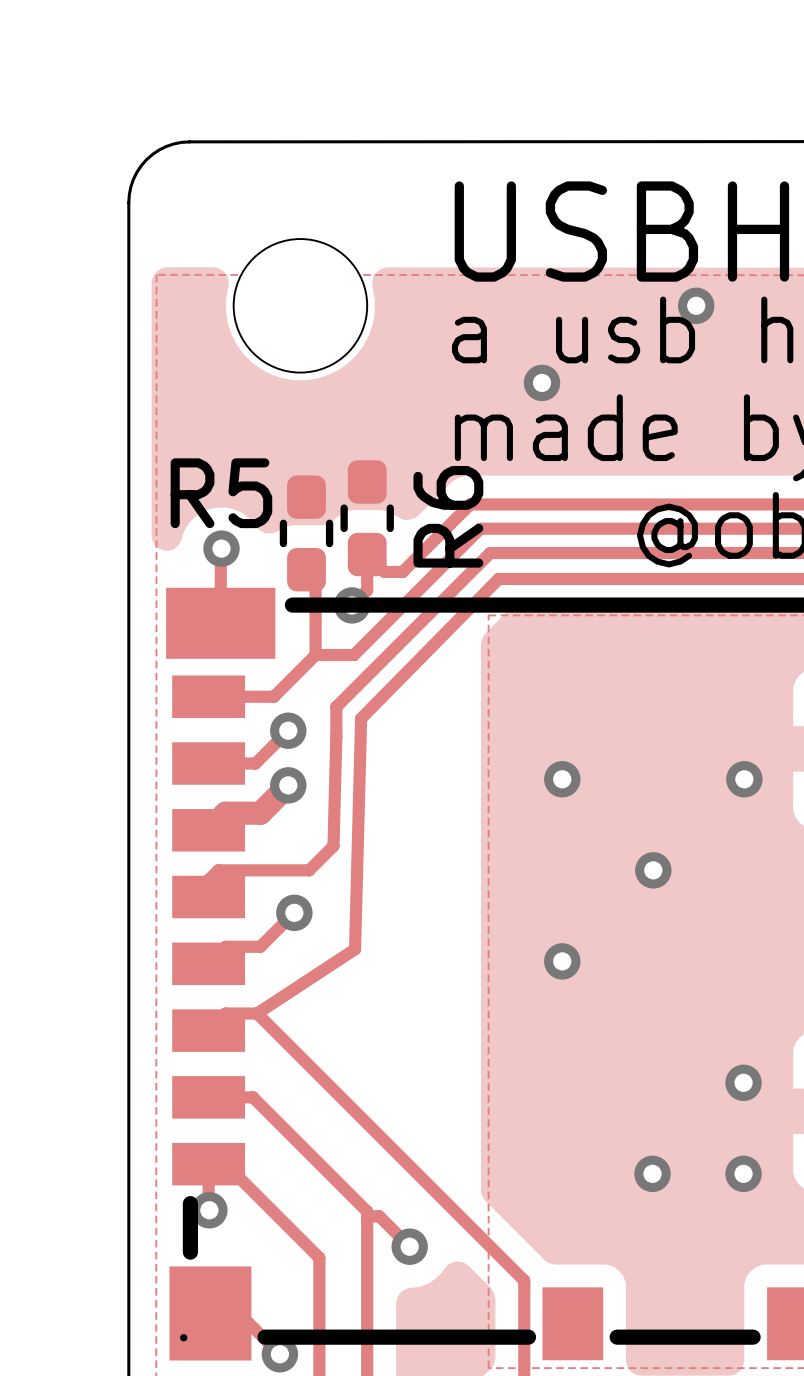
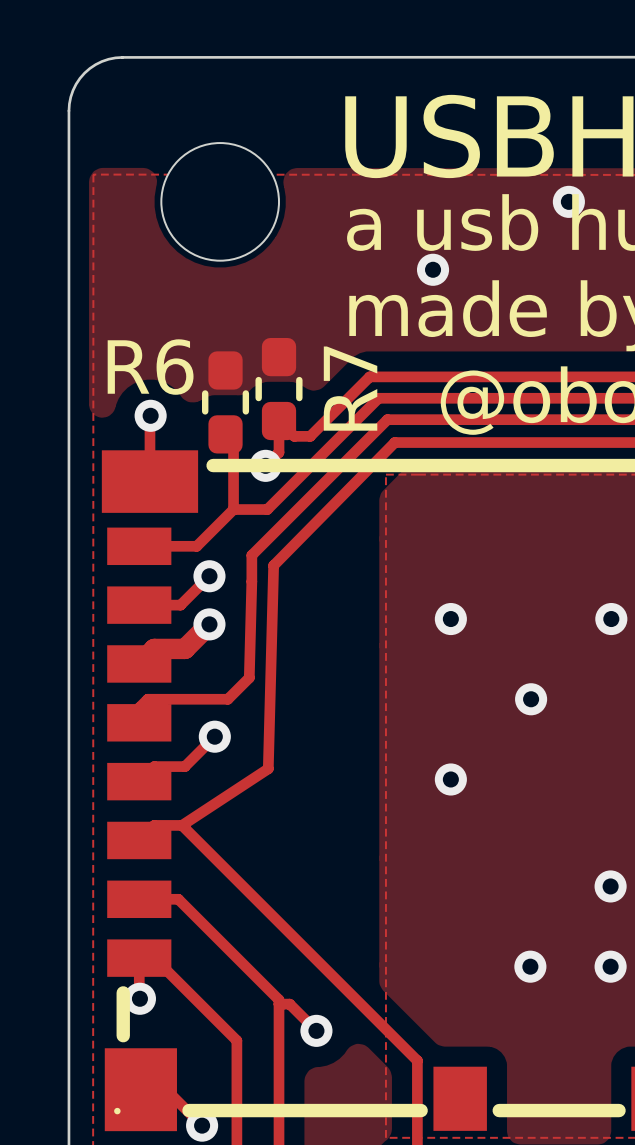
R5 name: R5 (221, 493) -> R6 (150, 367)
R6 name: R6 (448, 516) -> R7 (350, 388)

